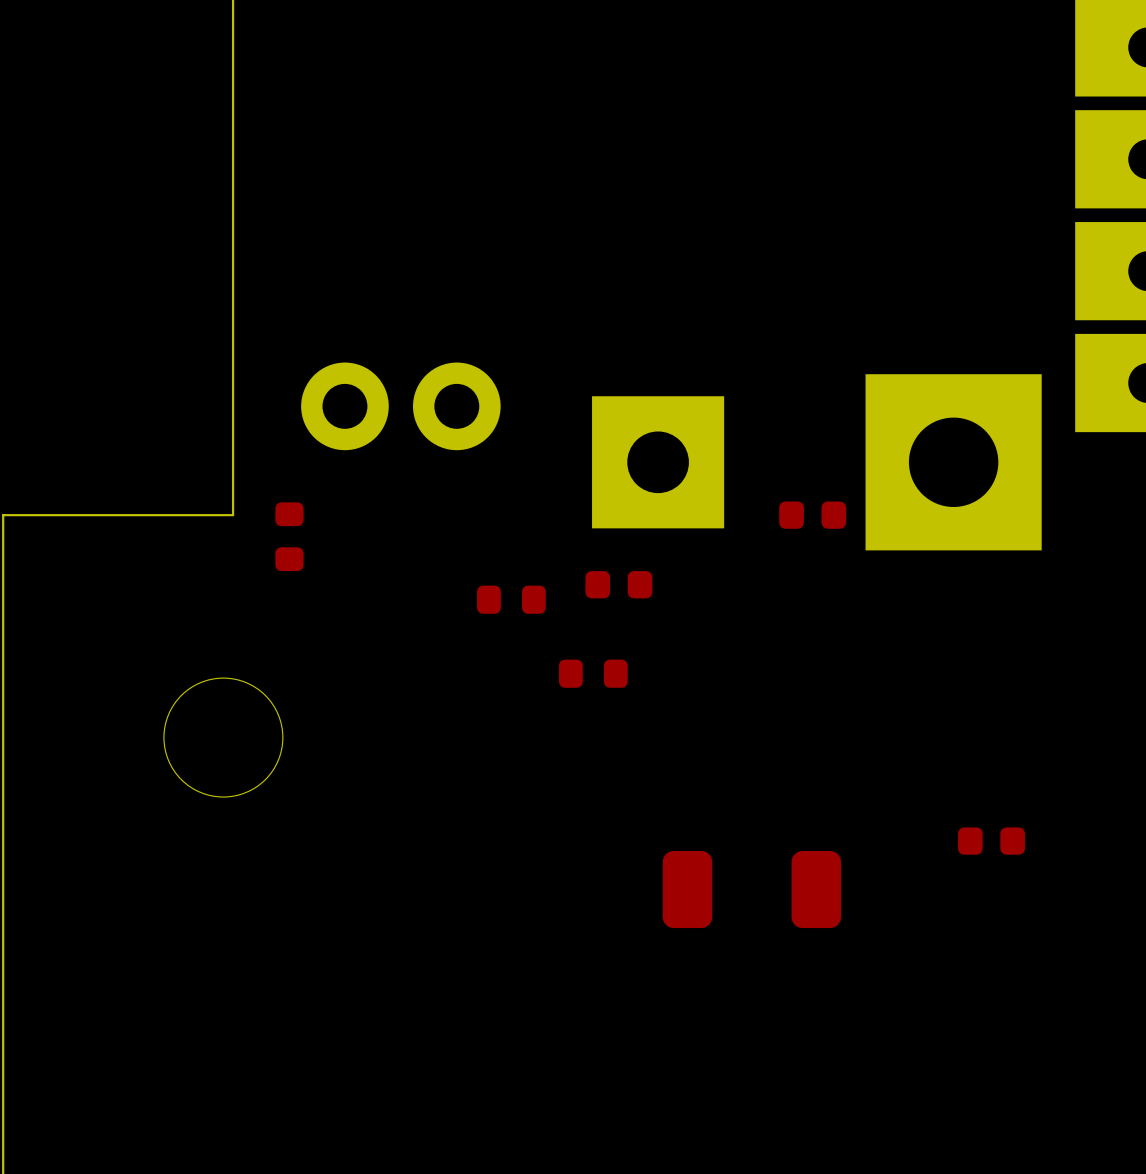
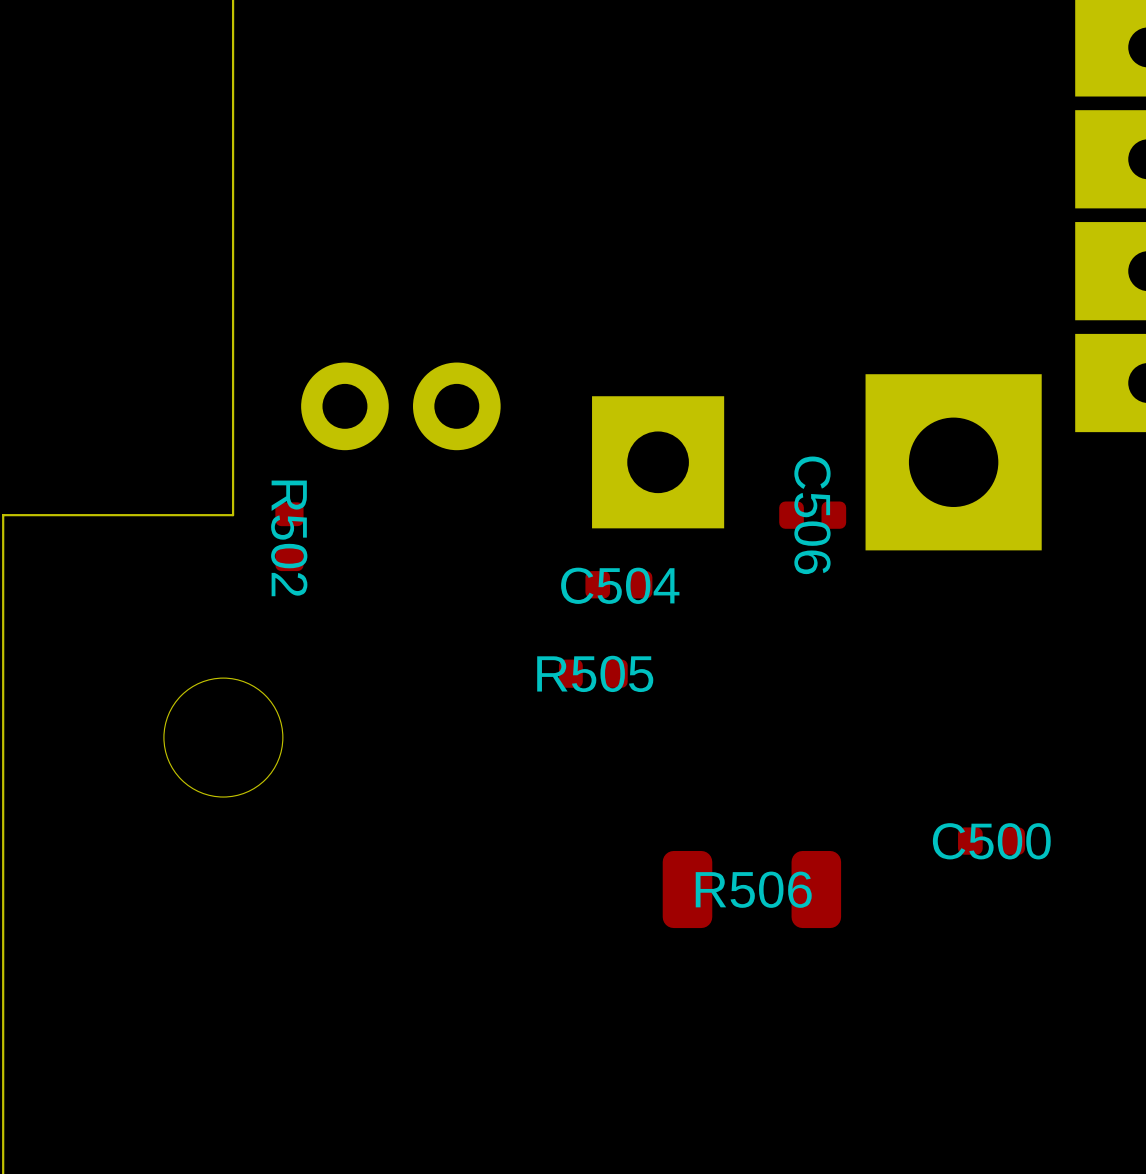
C506 name: none -> C506 (812, 515)
R502 name: none -> R502 (289, 538)
C504 name: none -> C504 (620, 585)
part: (511, 599) -> none
R505 name: none -> R505 (595, 673)
C500 name: none -> C500 (991, 841)
R506 name: none -> R506 (753, 889)

